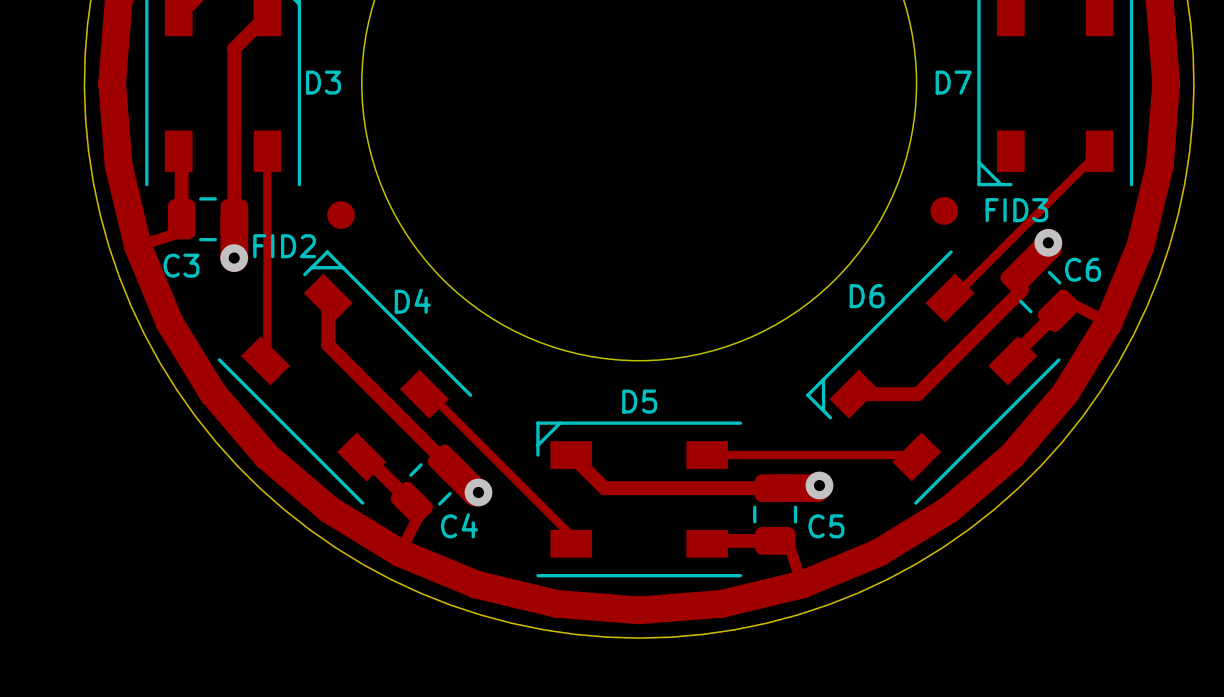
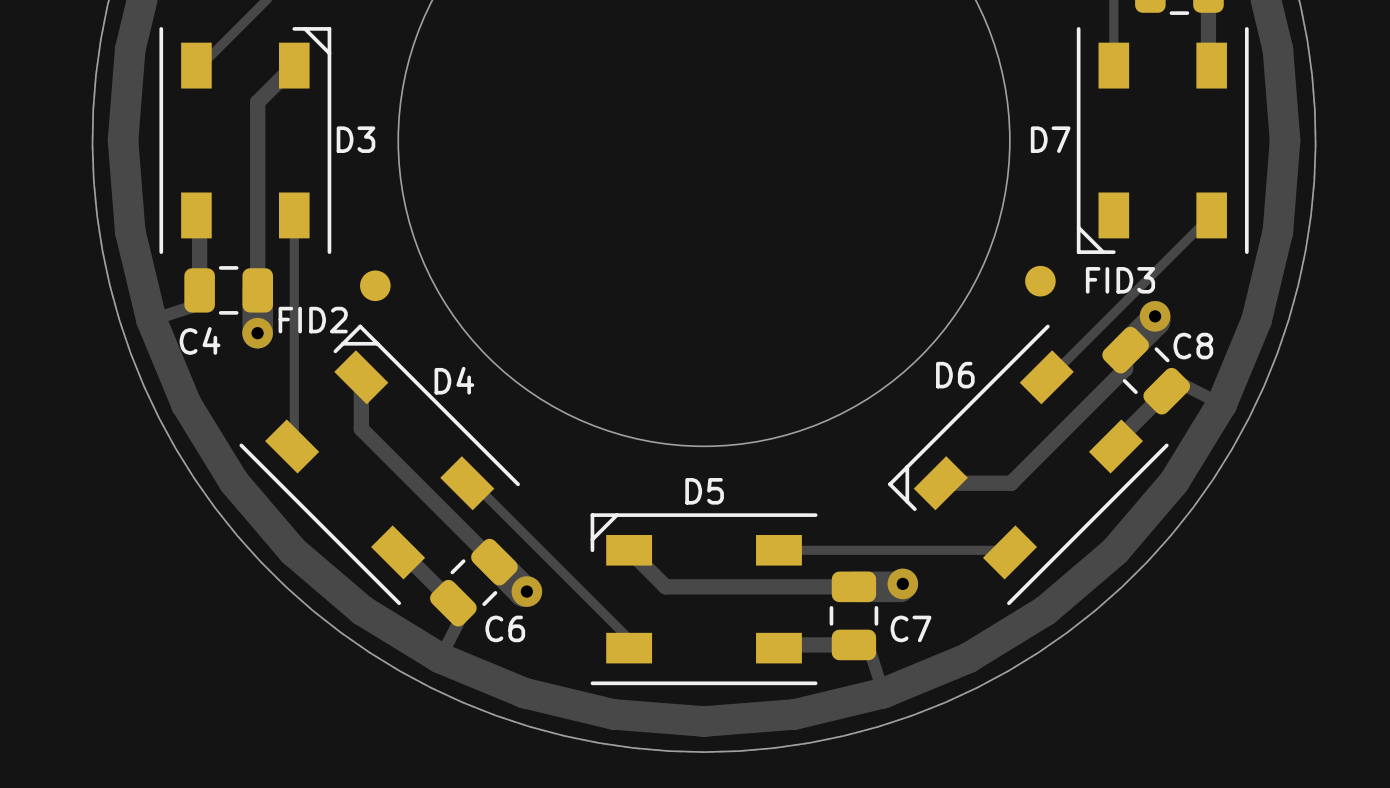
C3 name: C3 (181, 265) -> C4 (200, 340)
C6 name: C6 (1082, 269) -> C8 (1193, 346)
C4 name: C4 (459, 525) -> C6 (505, 628)
C5 name: C5 (826, 526) -> C7 (911, 628)

